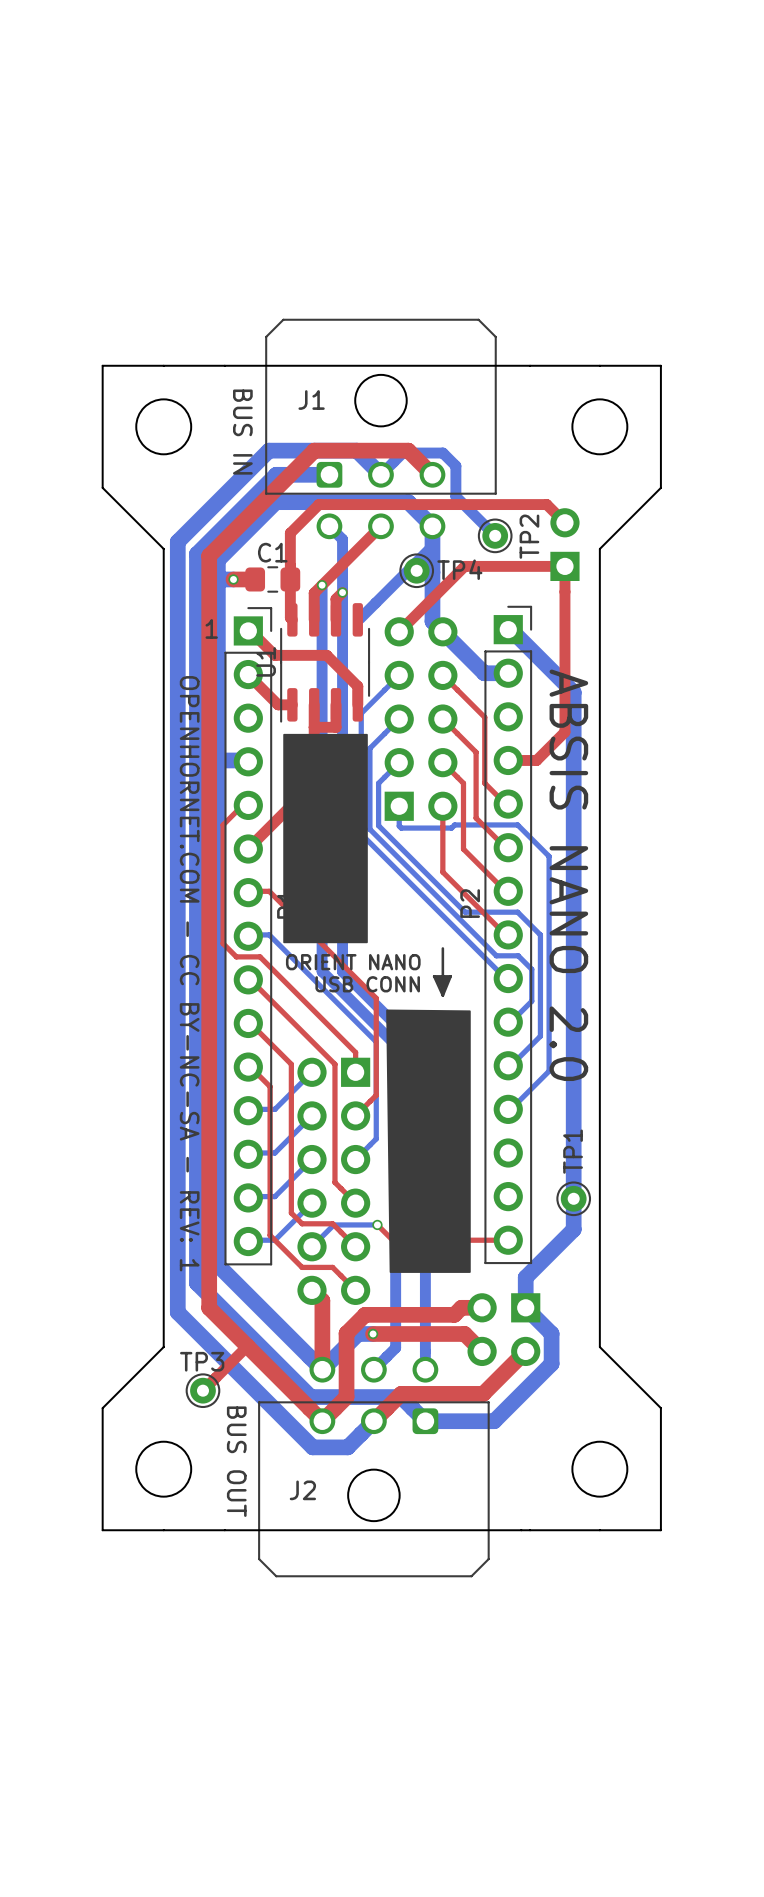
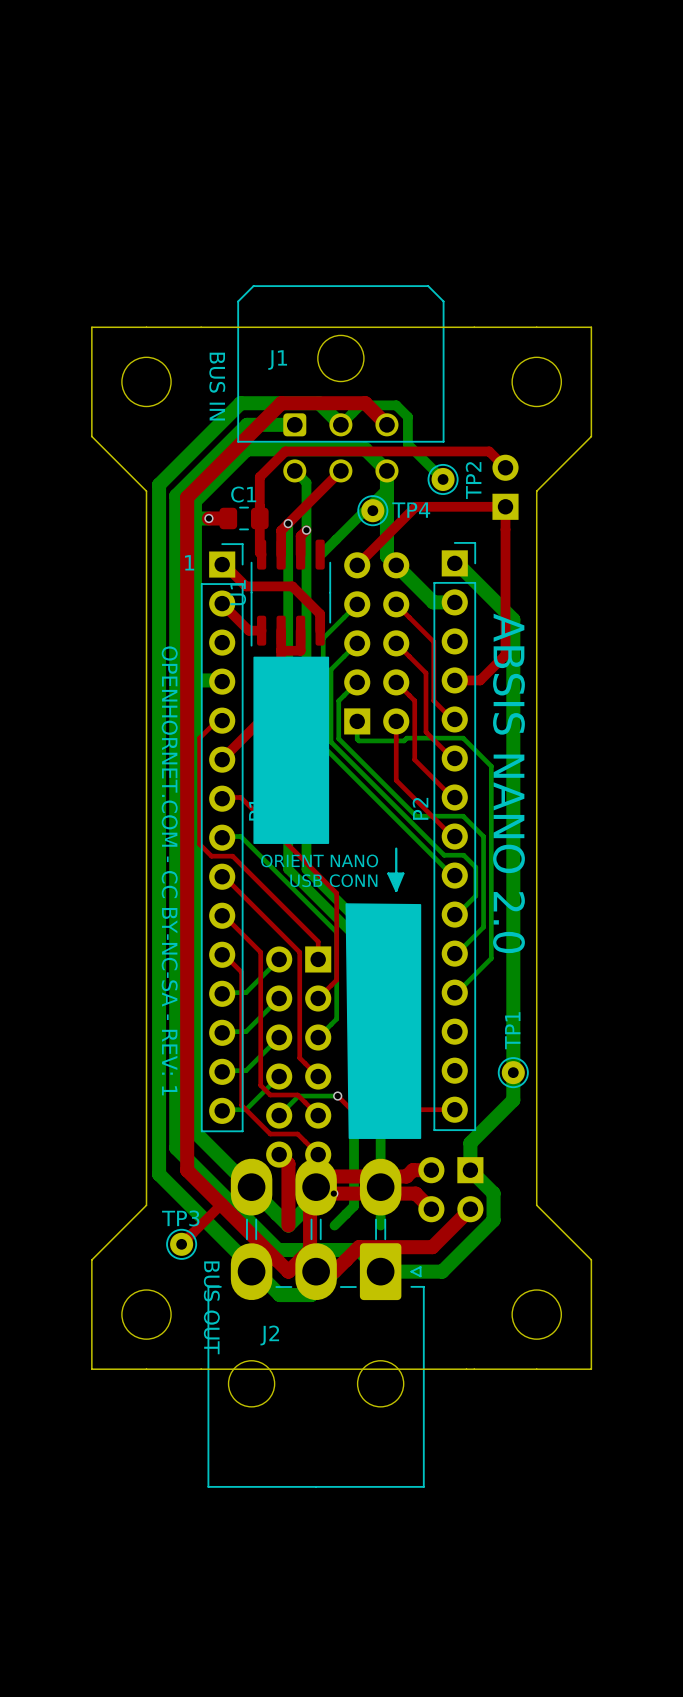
J2 footprint: [258, 1356, 490, 1578] -> [207, 1158, 425, 1488]

